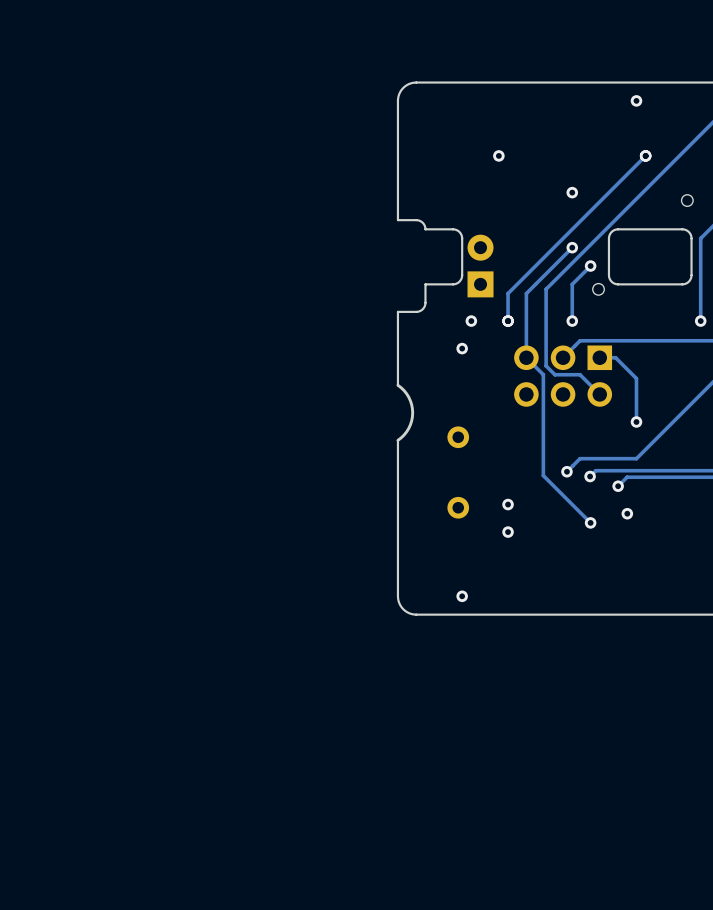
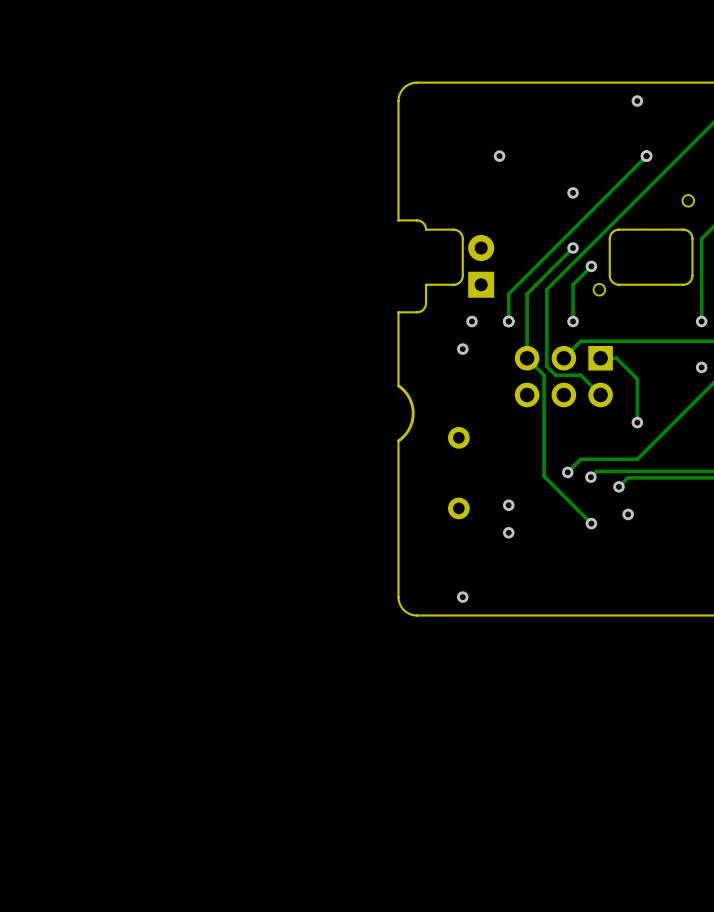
via: none -> (701, 367)

